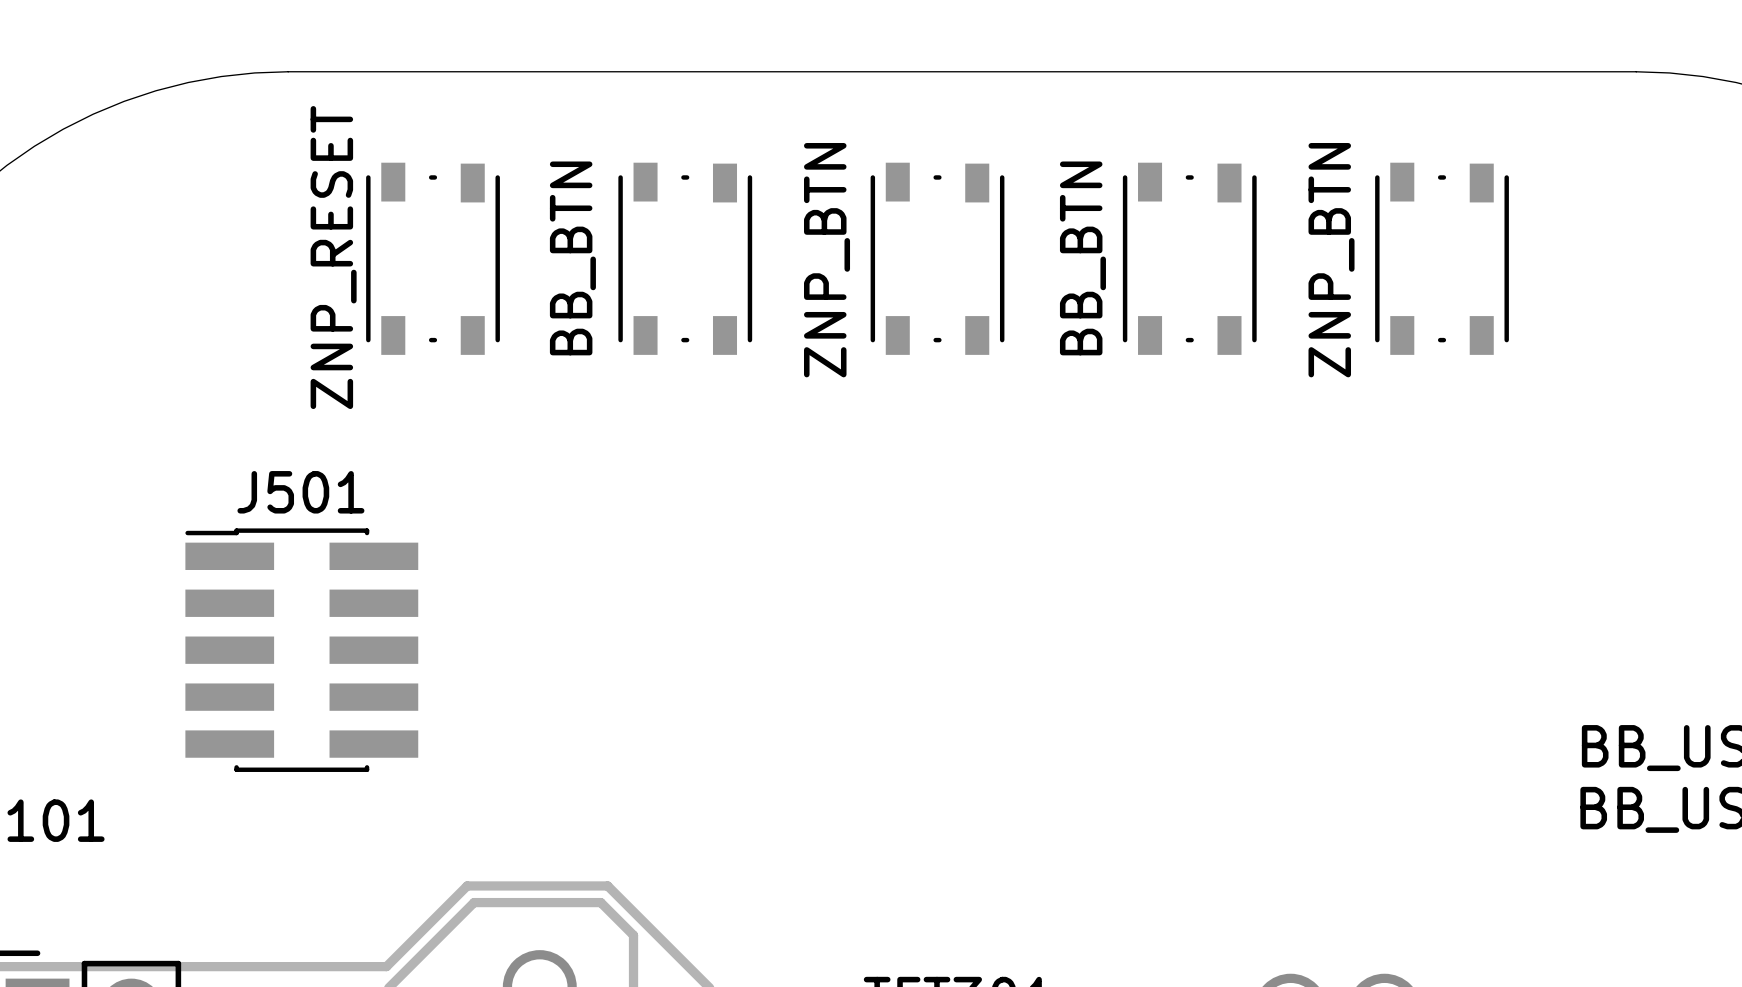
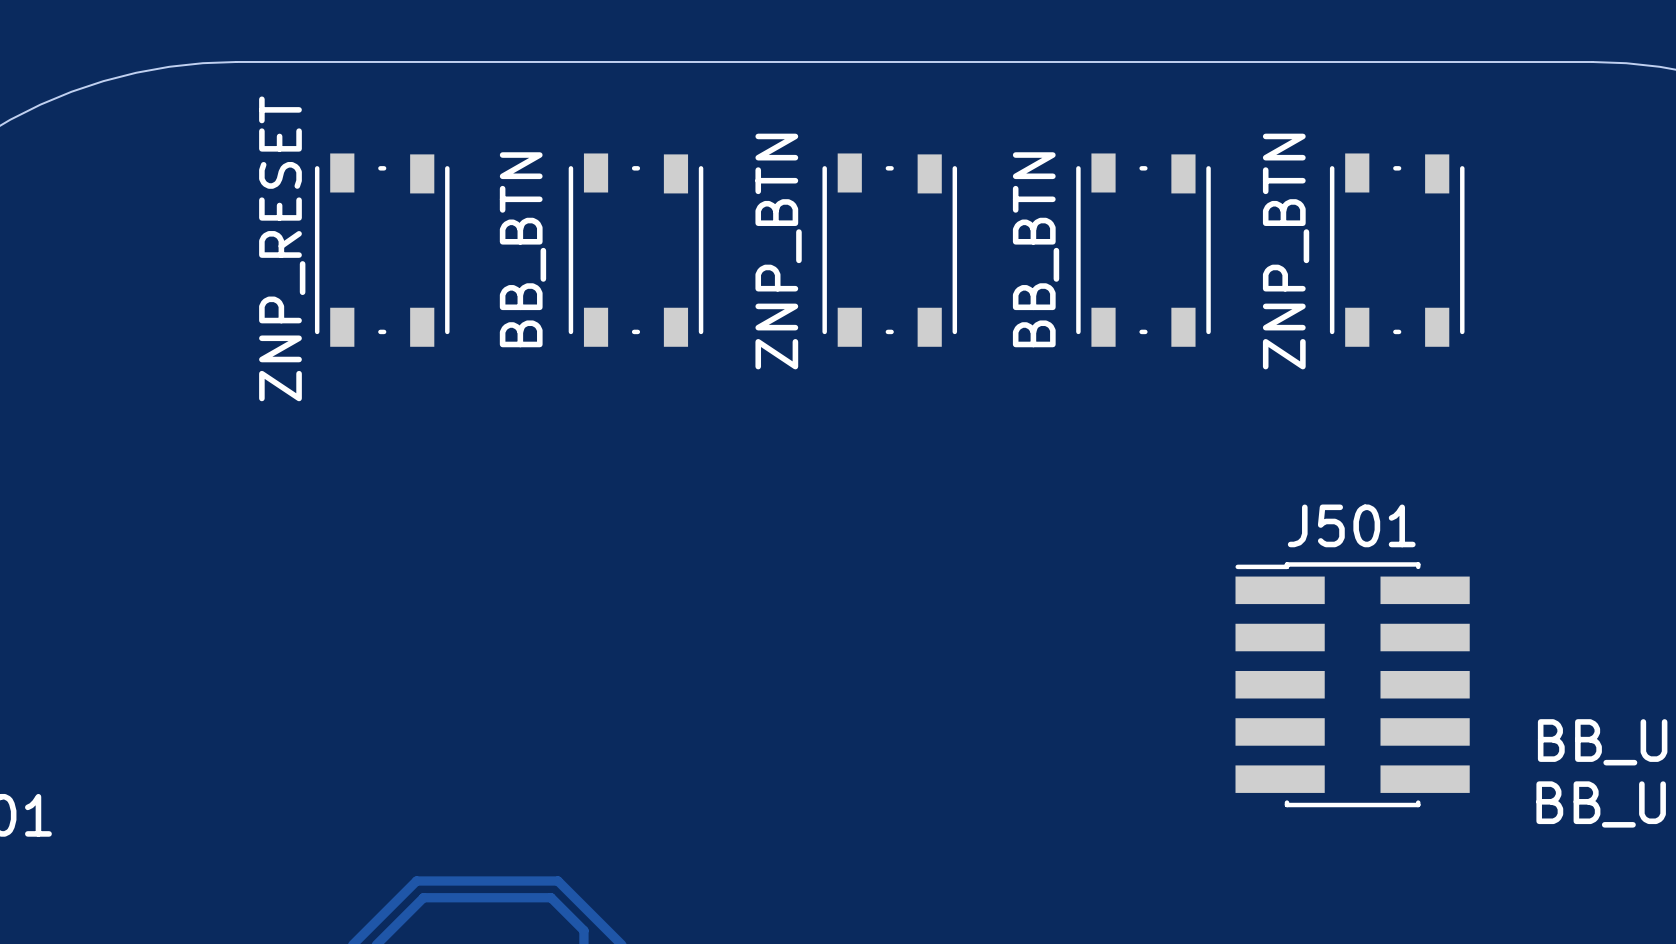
J501 position: (301, 650) -> (1352, 684)

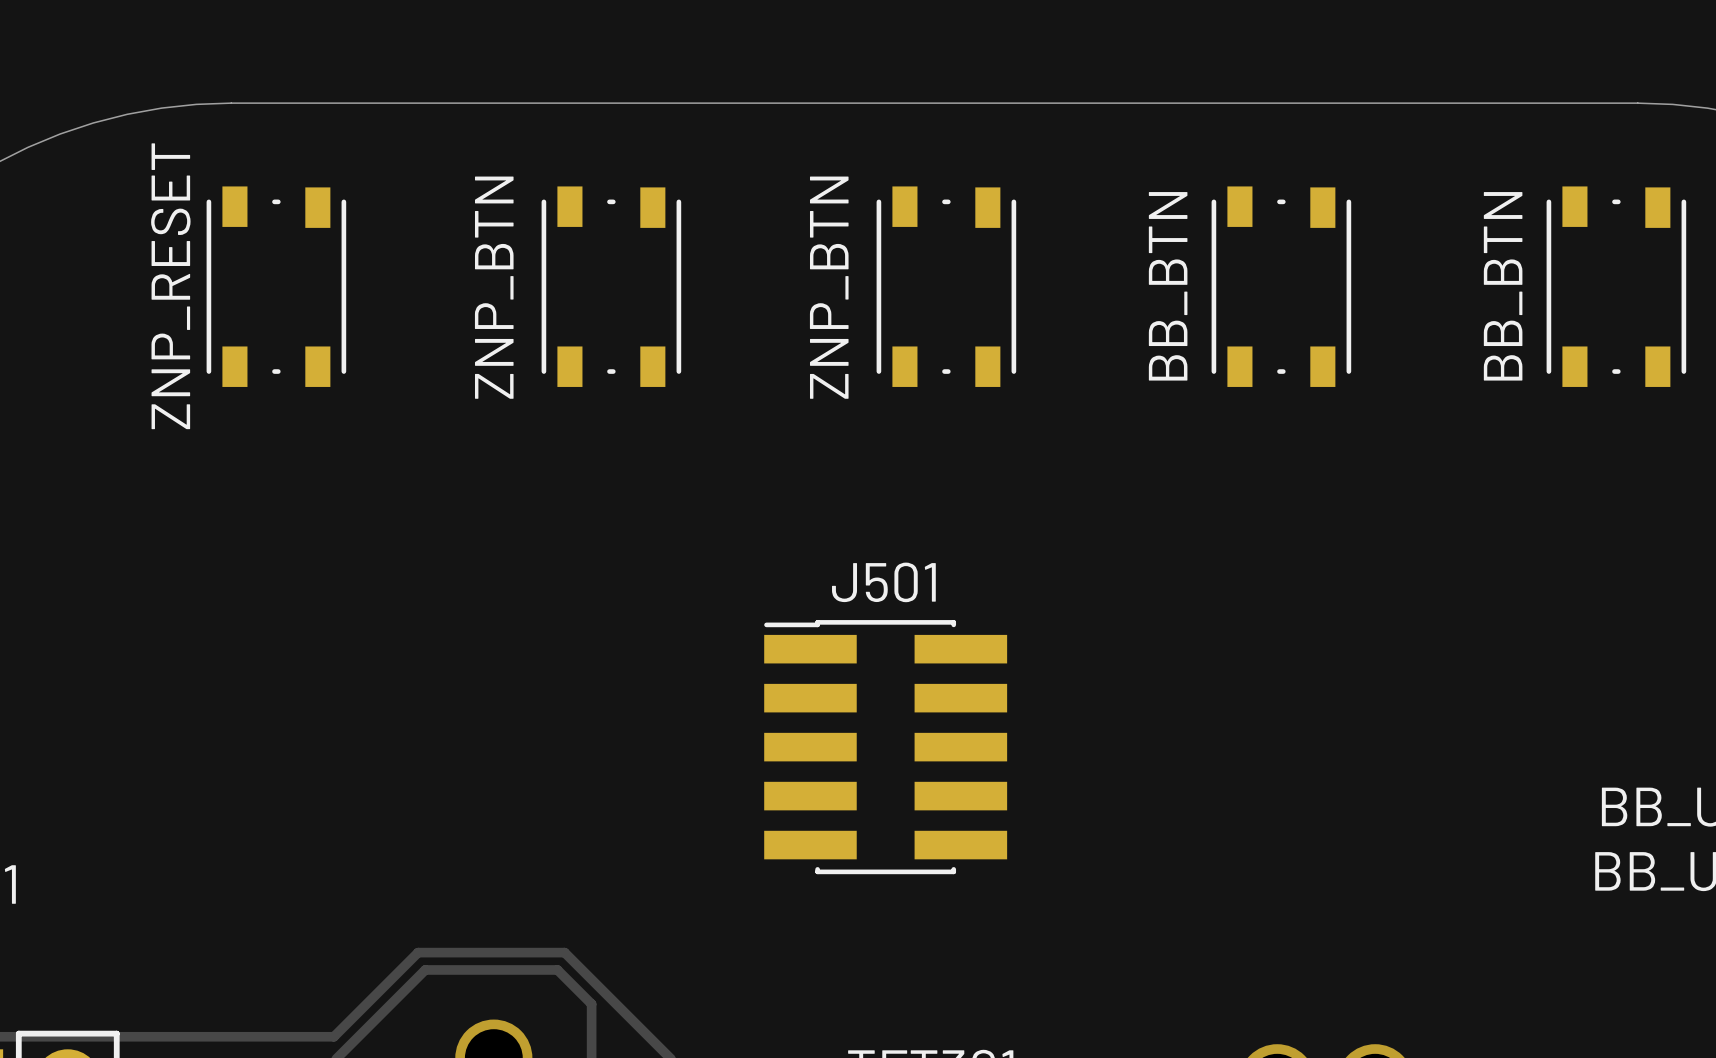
BB_BTN: none -> (1616, 286)
BB_BTN name: BB_BTN (522, 249) -> ZNP_BTN (494, 287)
ZNP_RESET position: (382, 250) -> (276, 286)
BB_BTN position: (636, 250) -> (611, 286)
ZNP_BTN position: (889, 250) -> (946, 286)
BB_BTN position: (1143, 250) -> (1281, 286)
ZNP_BTN: (1397, 250) -> none
J501 position: (1352, 684) -> (885, 747)

